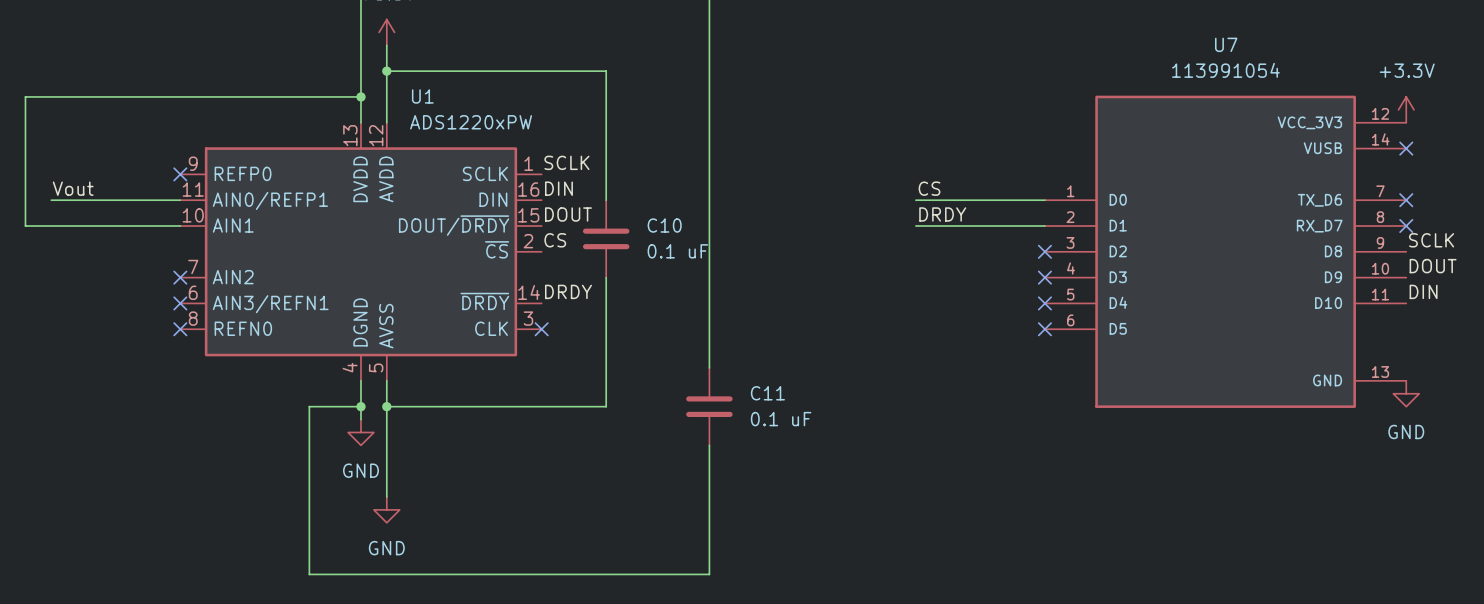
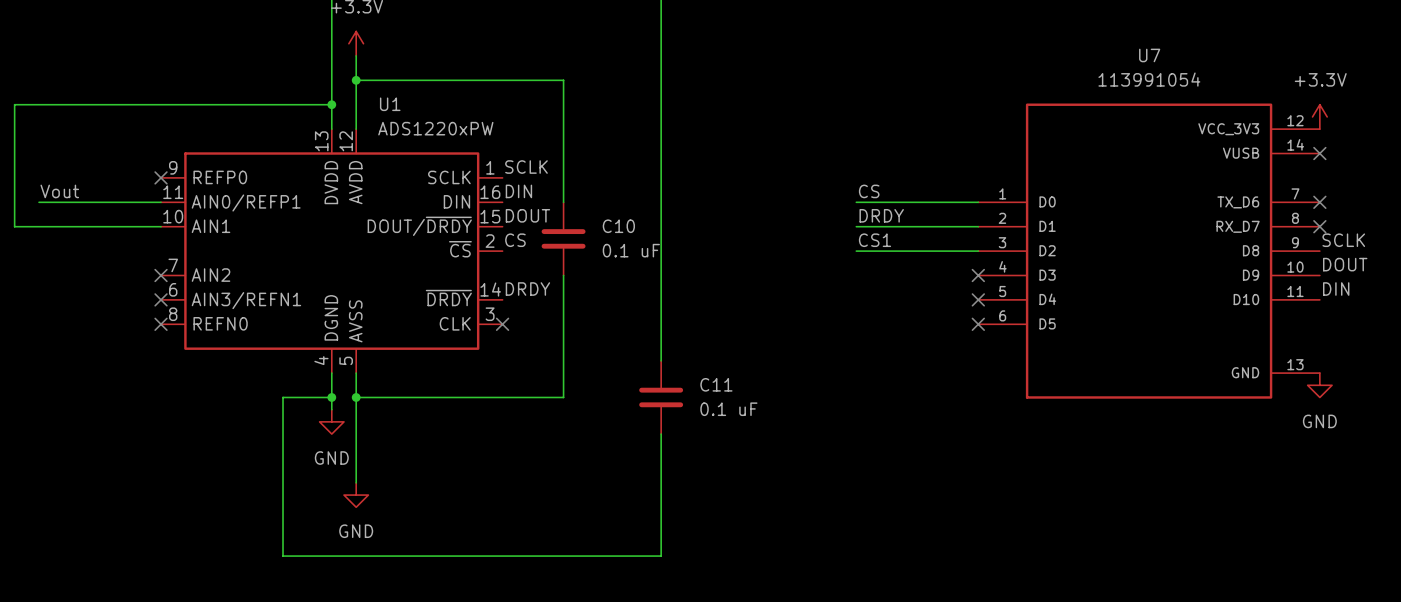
label: none -> CS1 (875, 240)
wire: none -> (856, 251) (978, 251)
no-connect mark: (1044, 251) -> none

